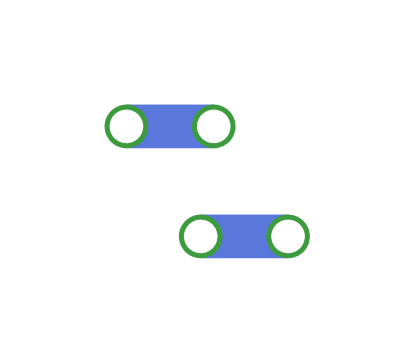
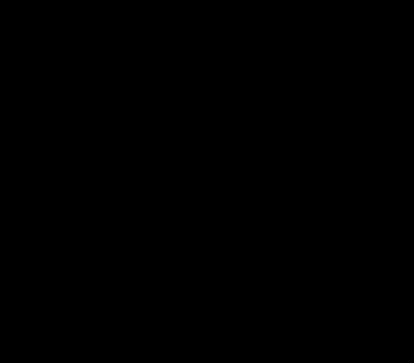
part: (170, 126) -> none
part: (244, 236) -> none

